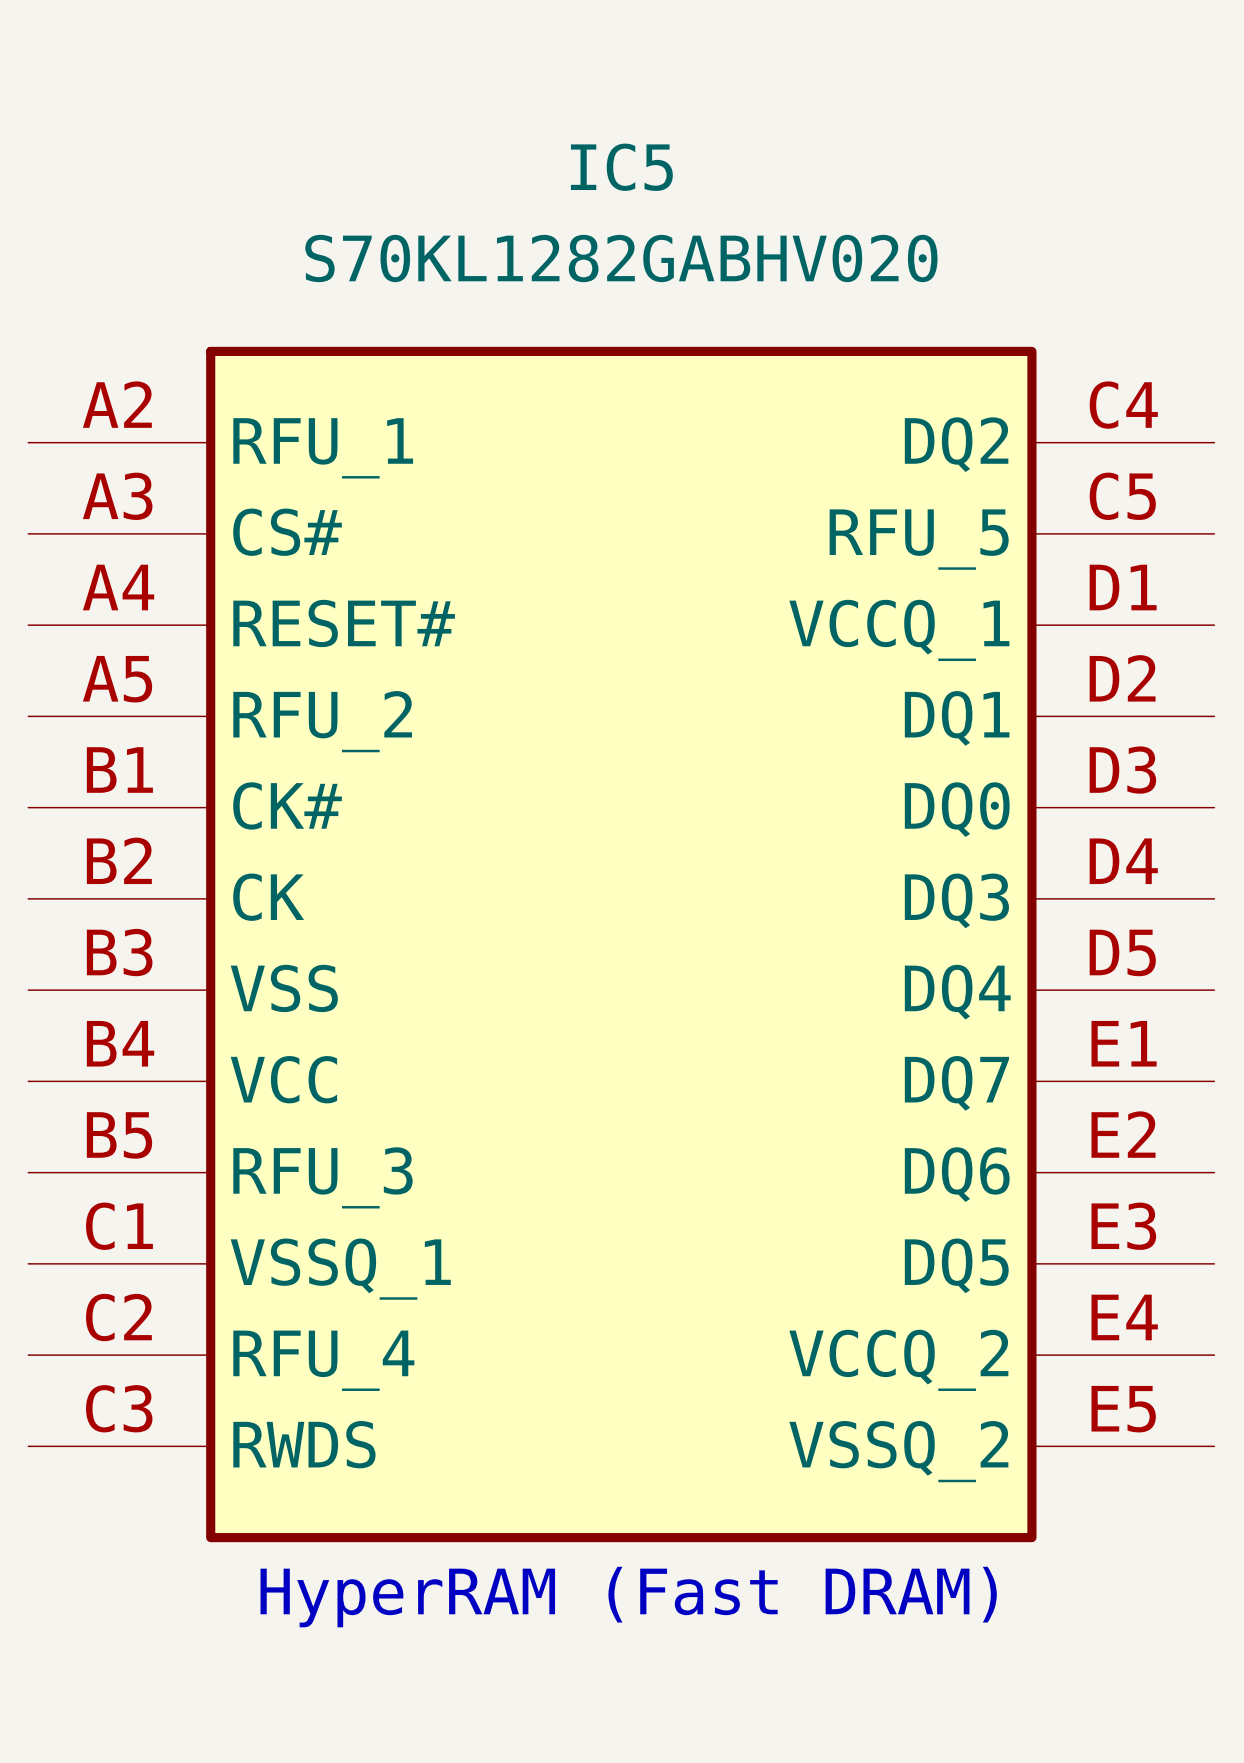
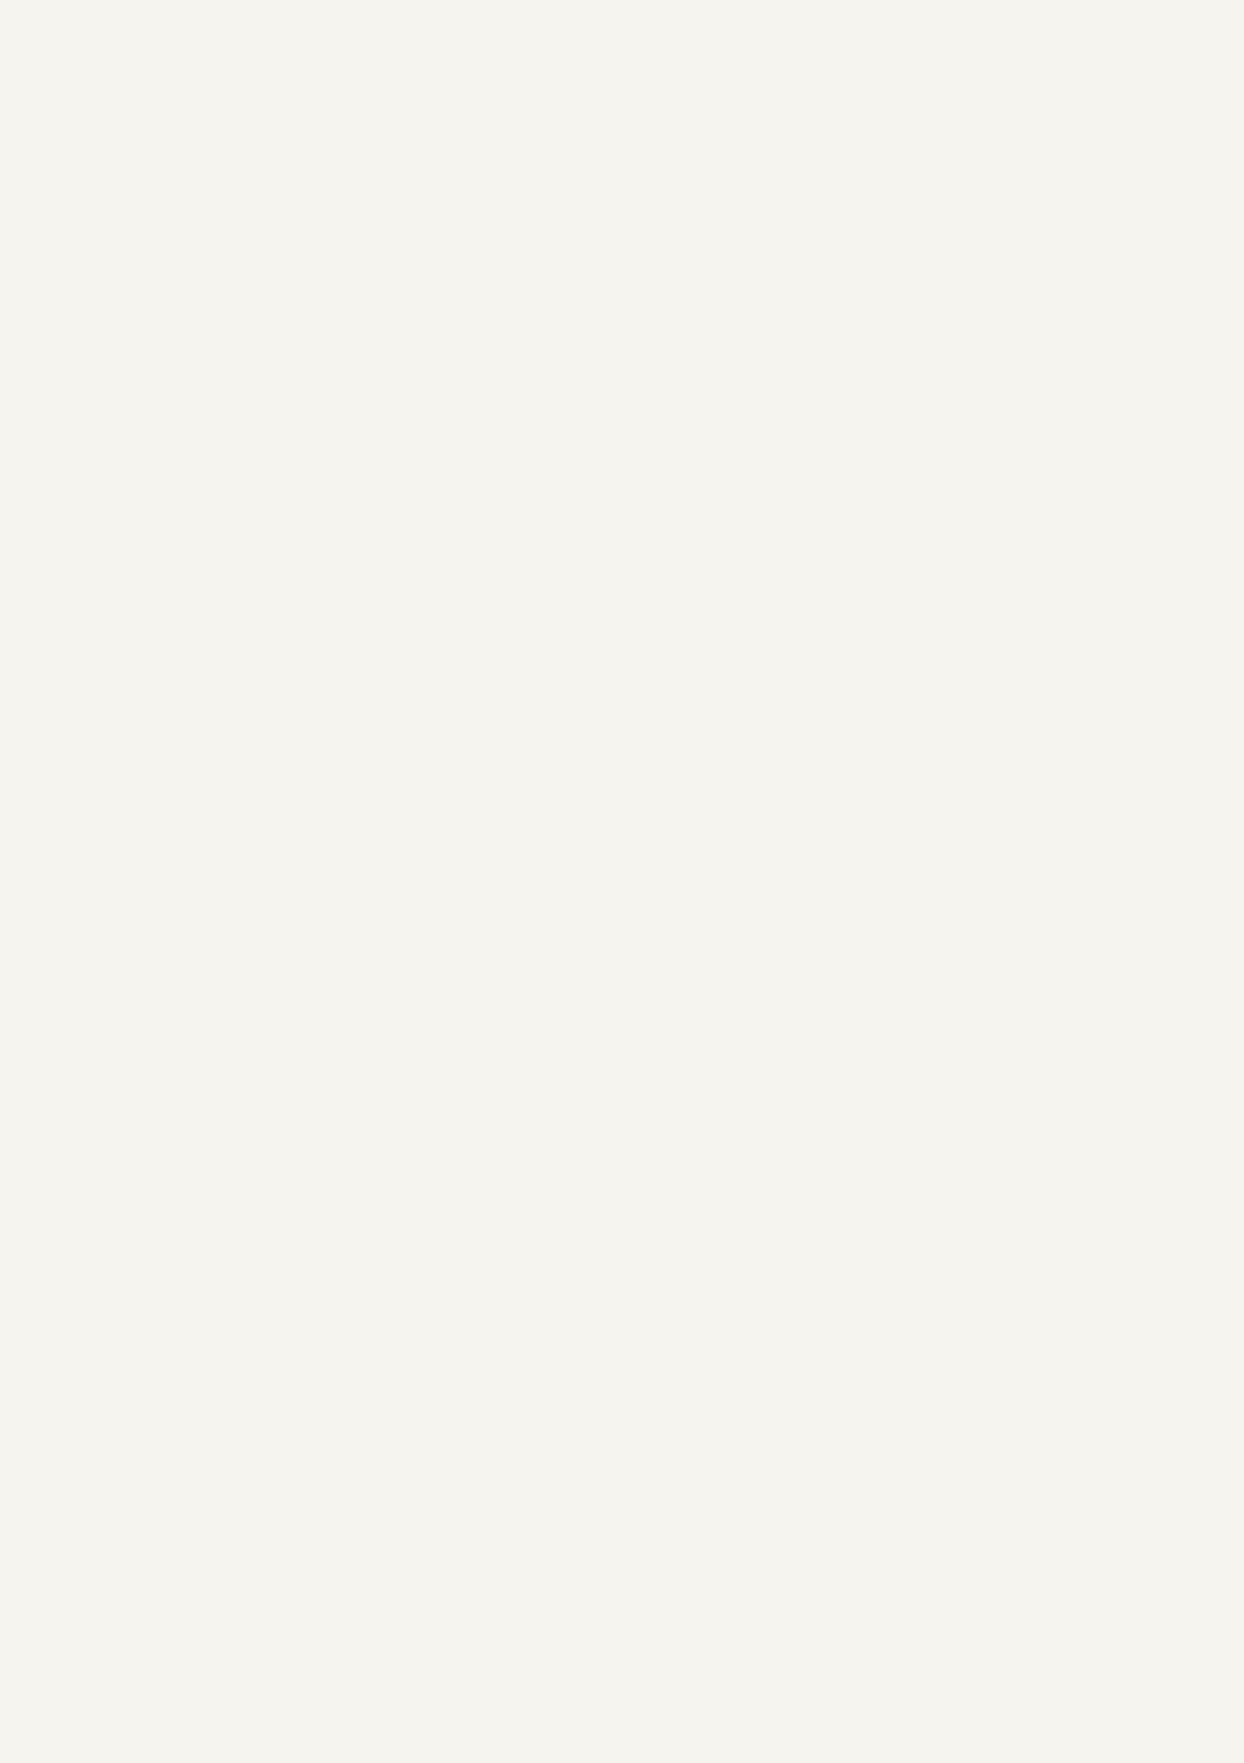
IC5: S70KL1282GABHV020 (621, 944) -> none
text: HyperRAM (Fast DRAM) (628, 1597) -> none

